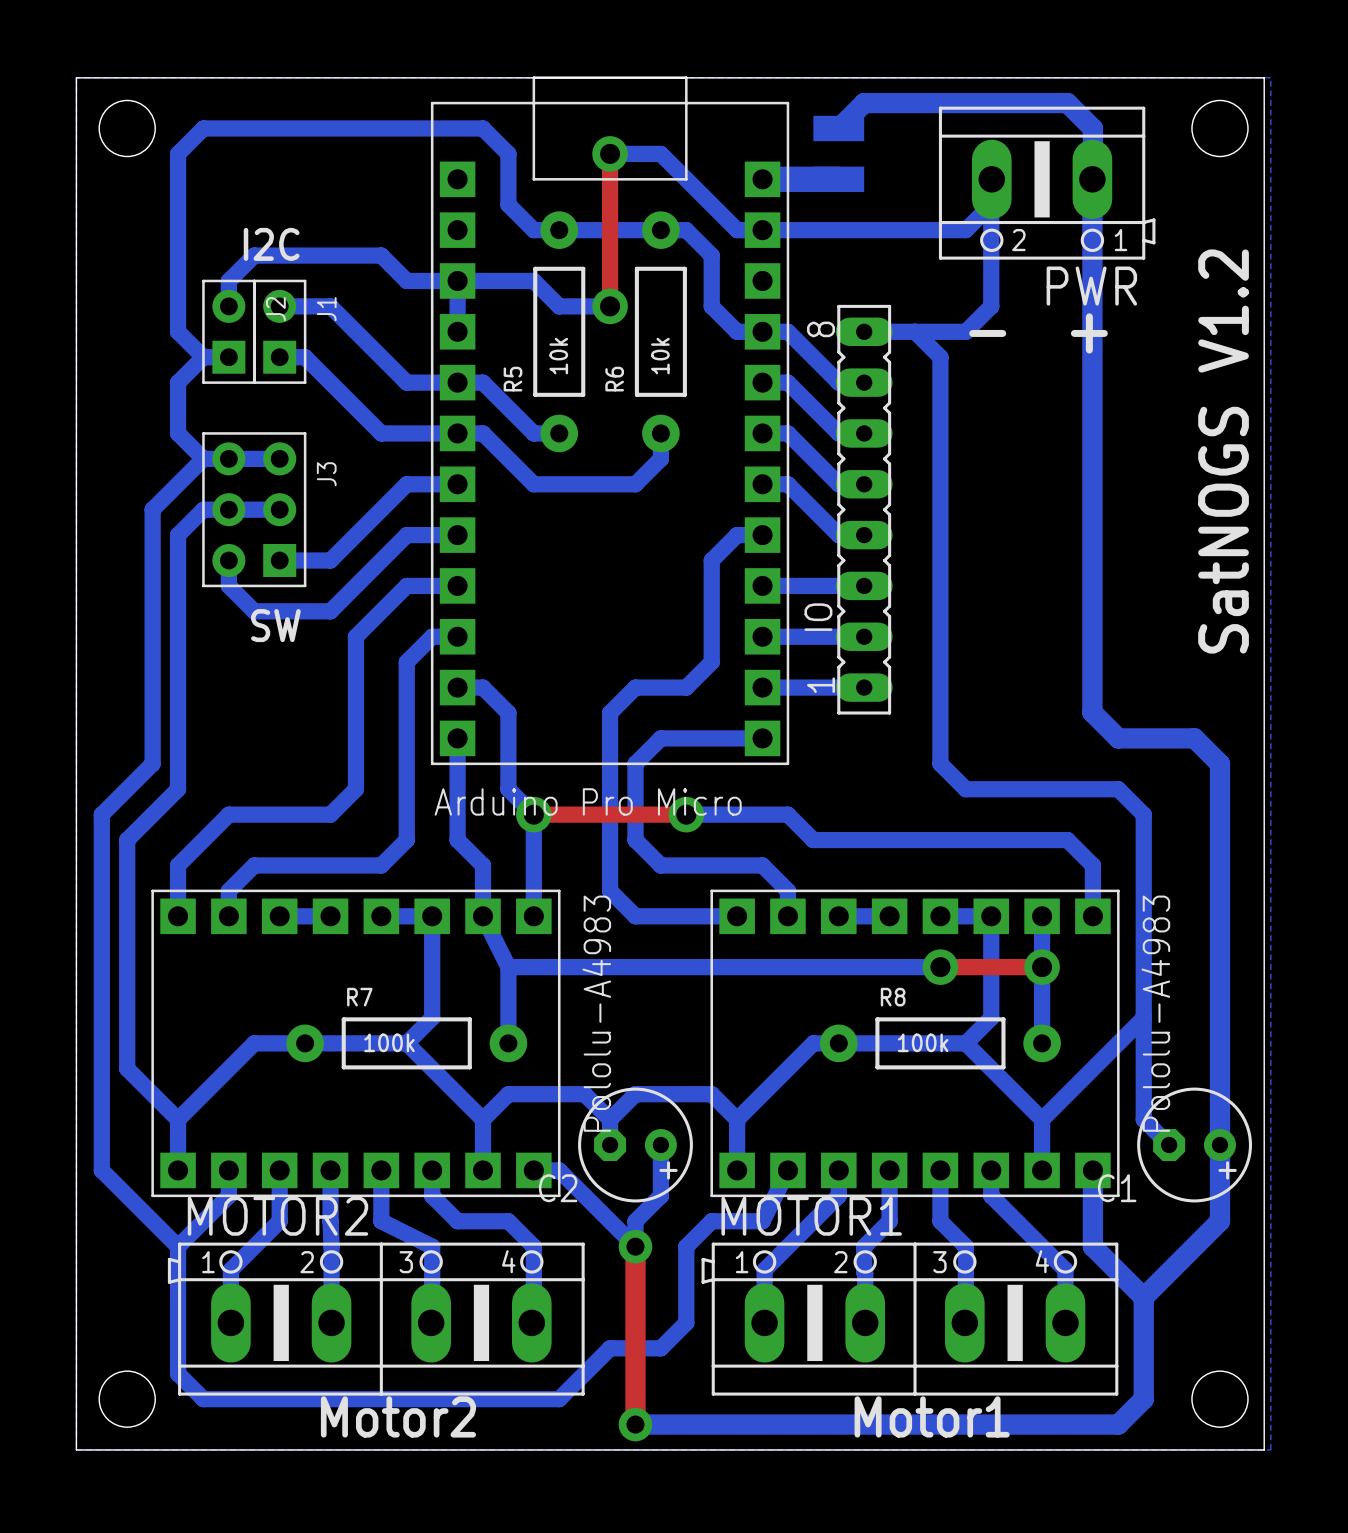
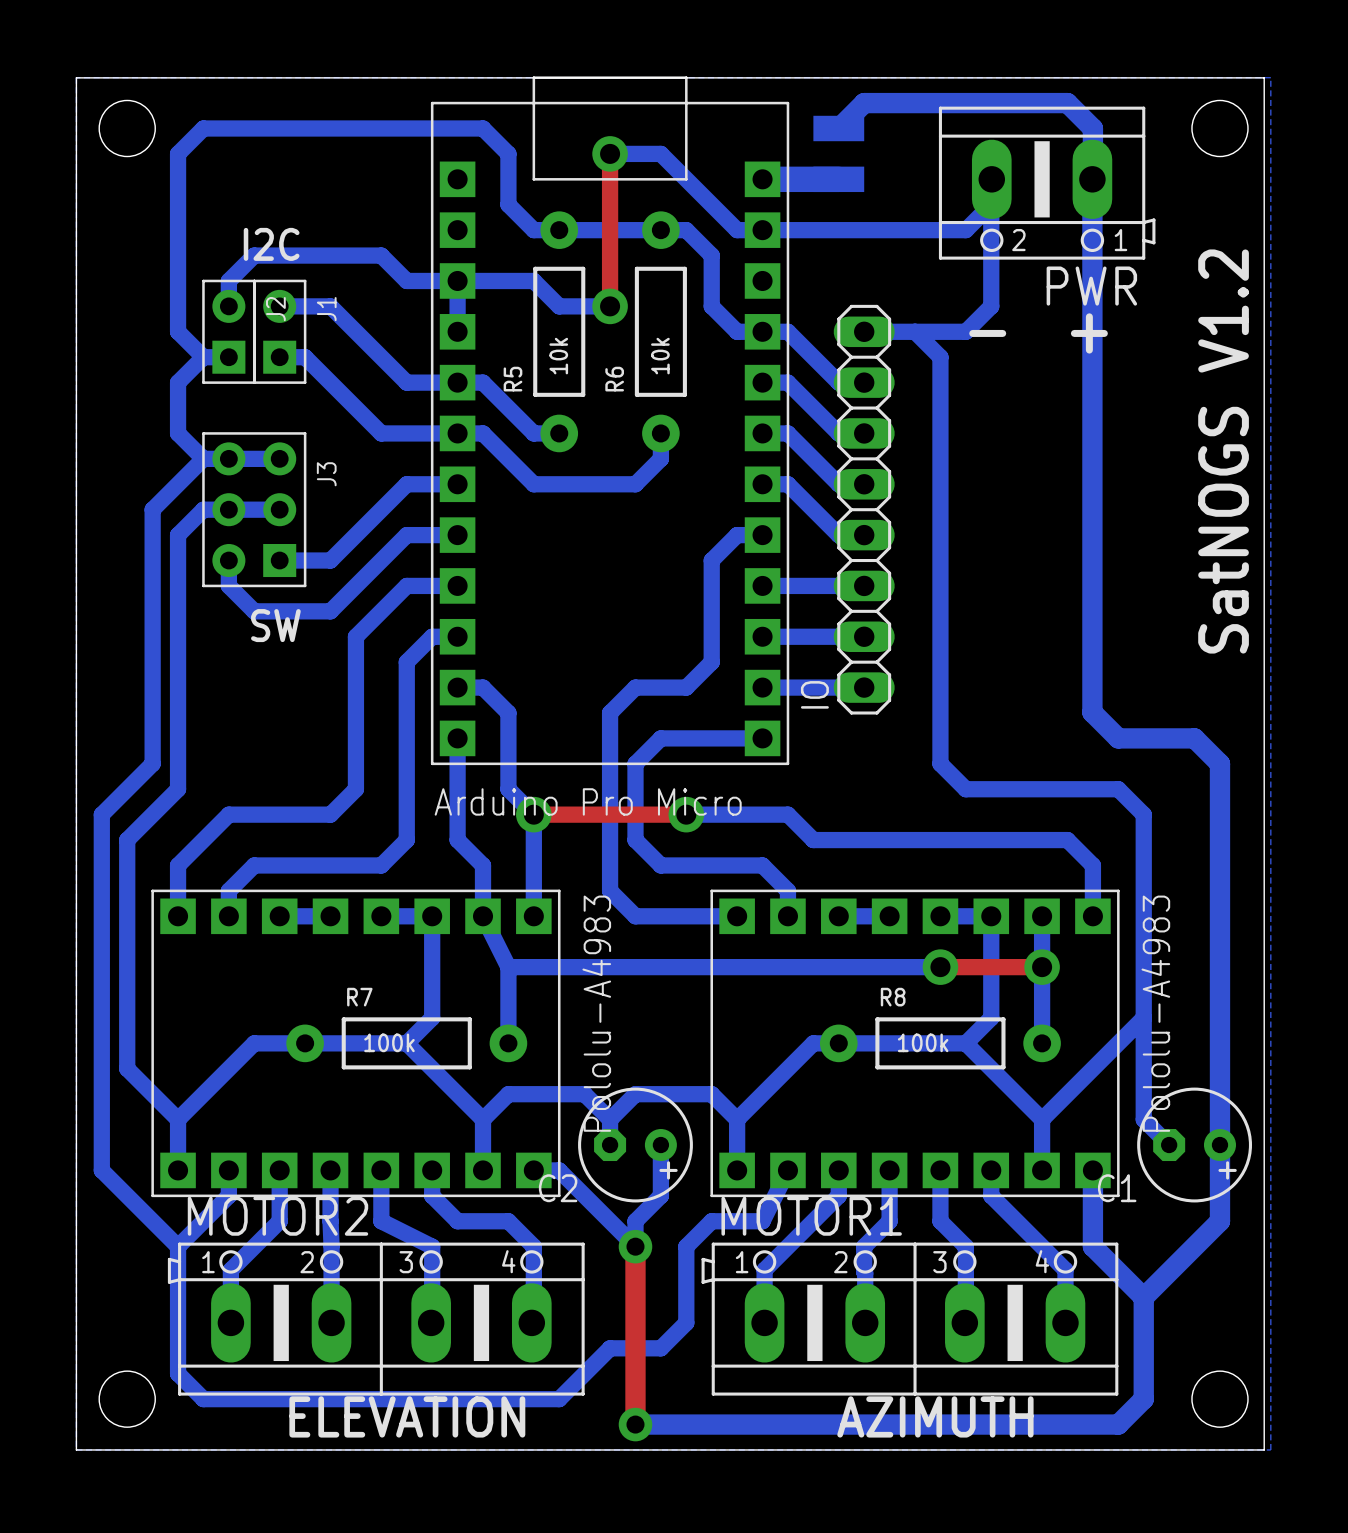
IO footprint: [835, 304, 893, 715] -> [833, 304, 895, 715]
IO name position: IO (818, 617) -> IO (814, 694)
text: Motor2 (398, 1416) -> none
text: none -> ELEVATION (407, 1416)
text: Motor1 (932, 1416) -> none
text: none -> AZIMUTH (935, 1416)

